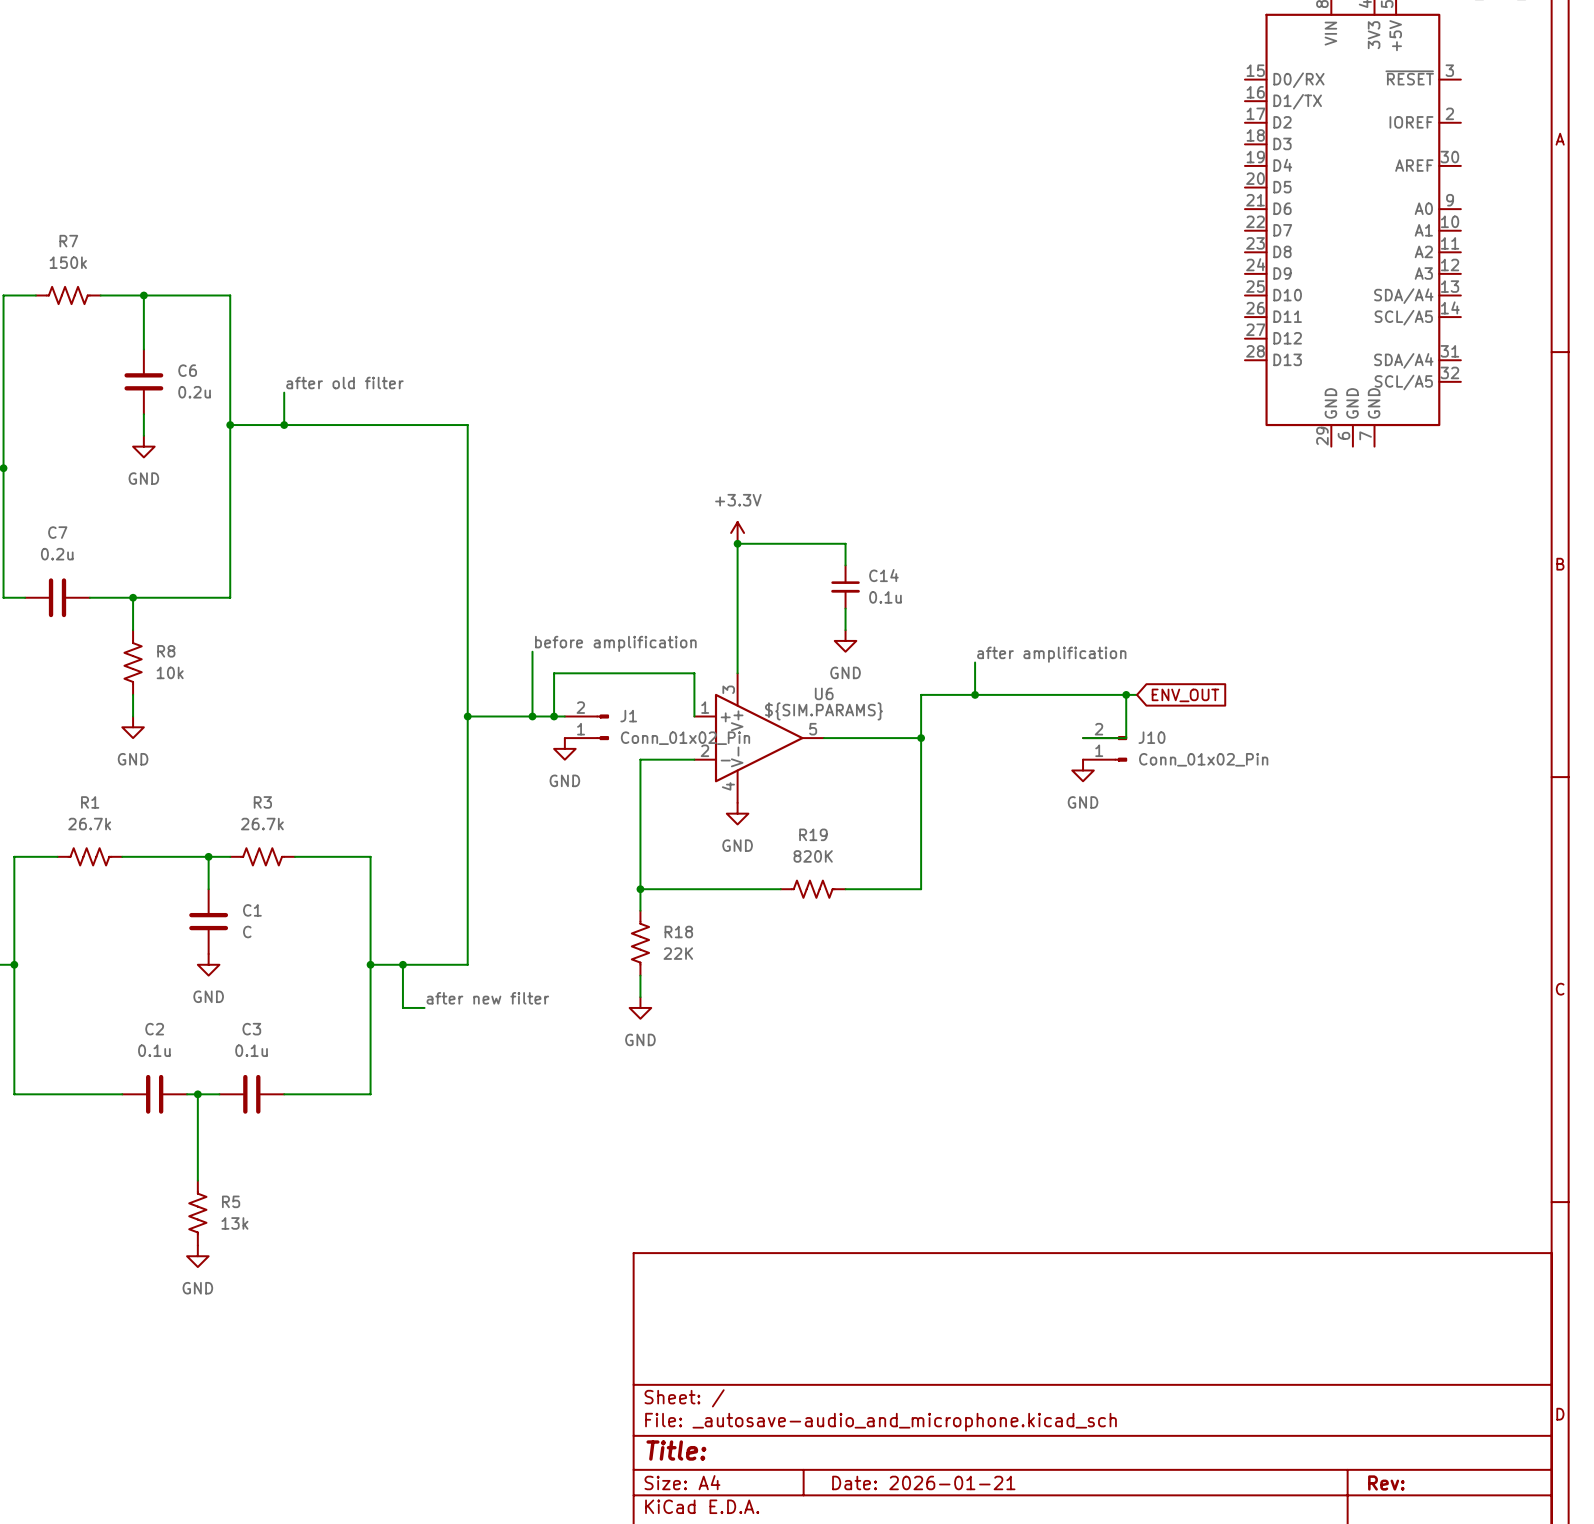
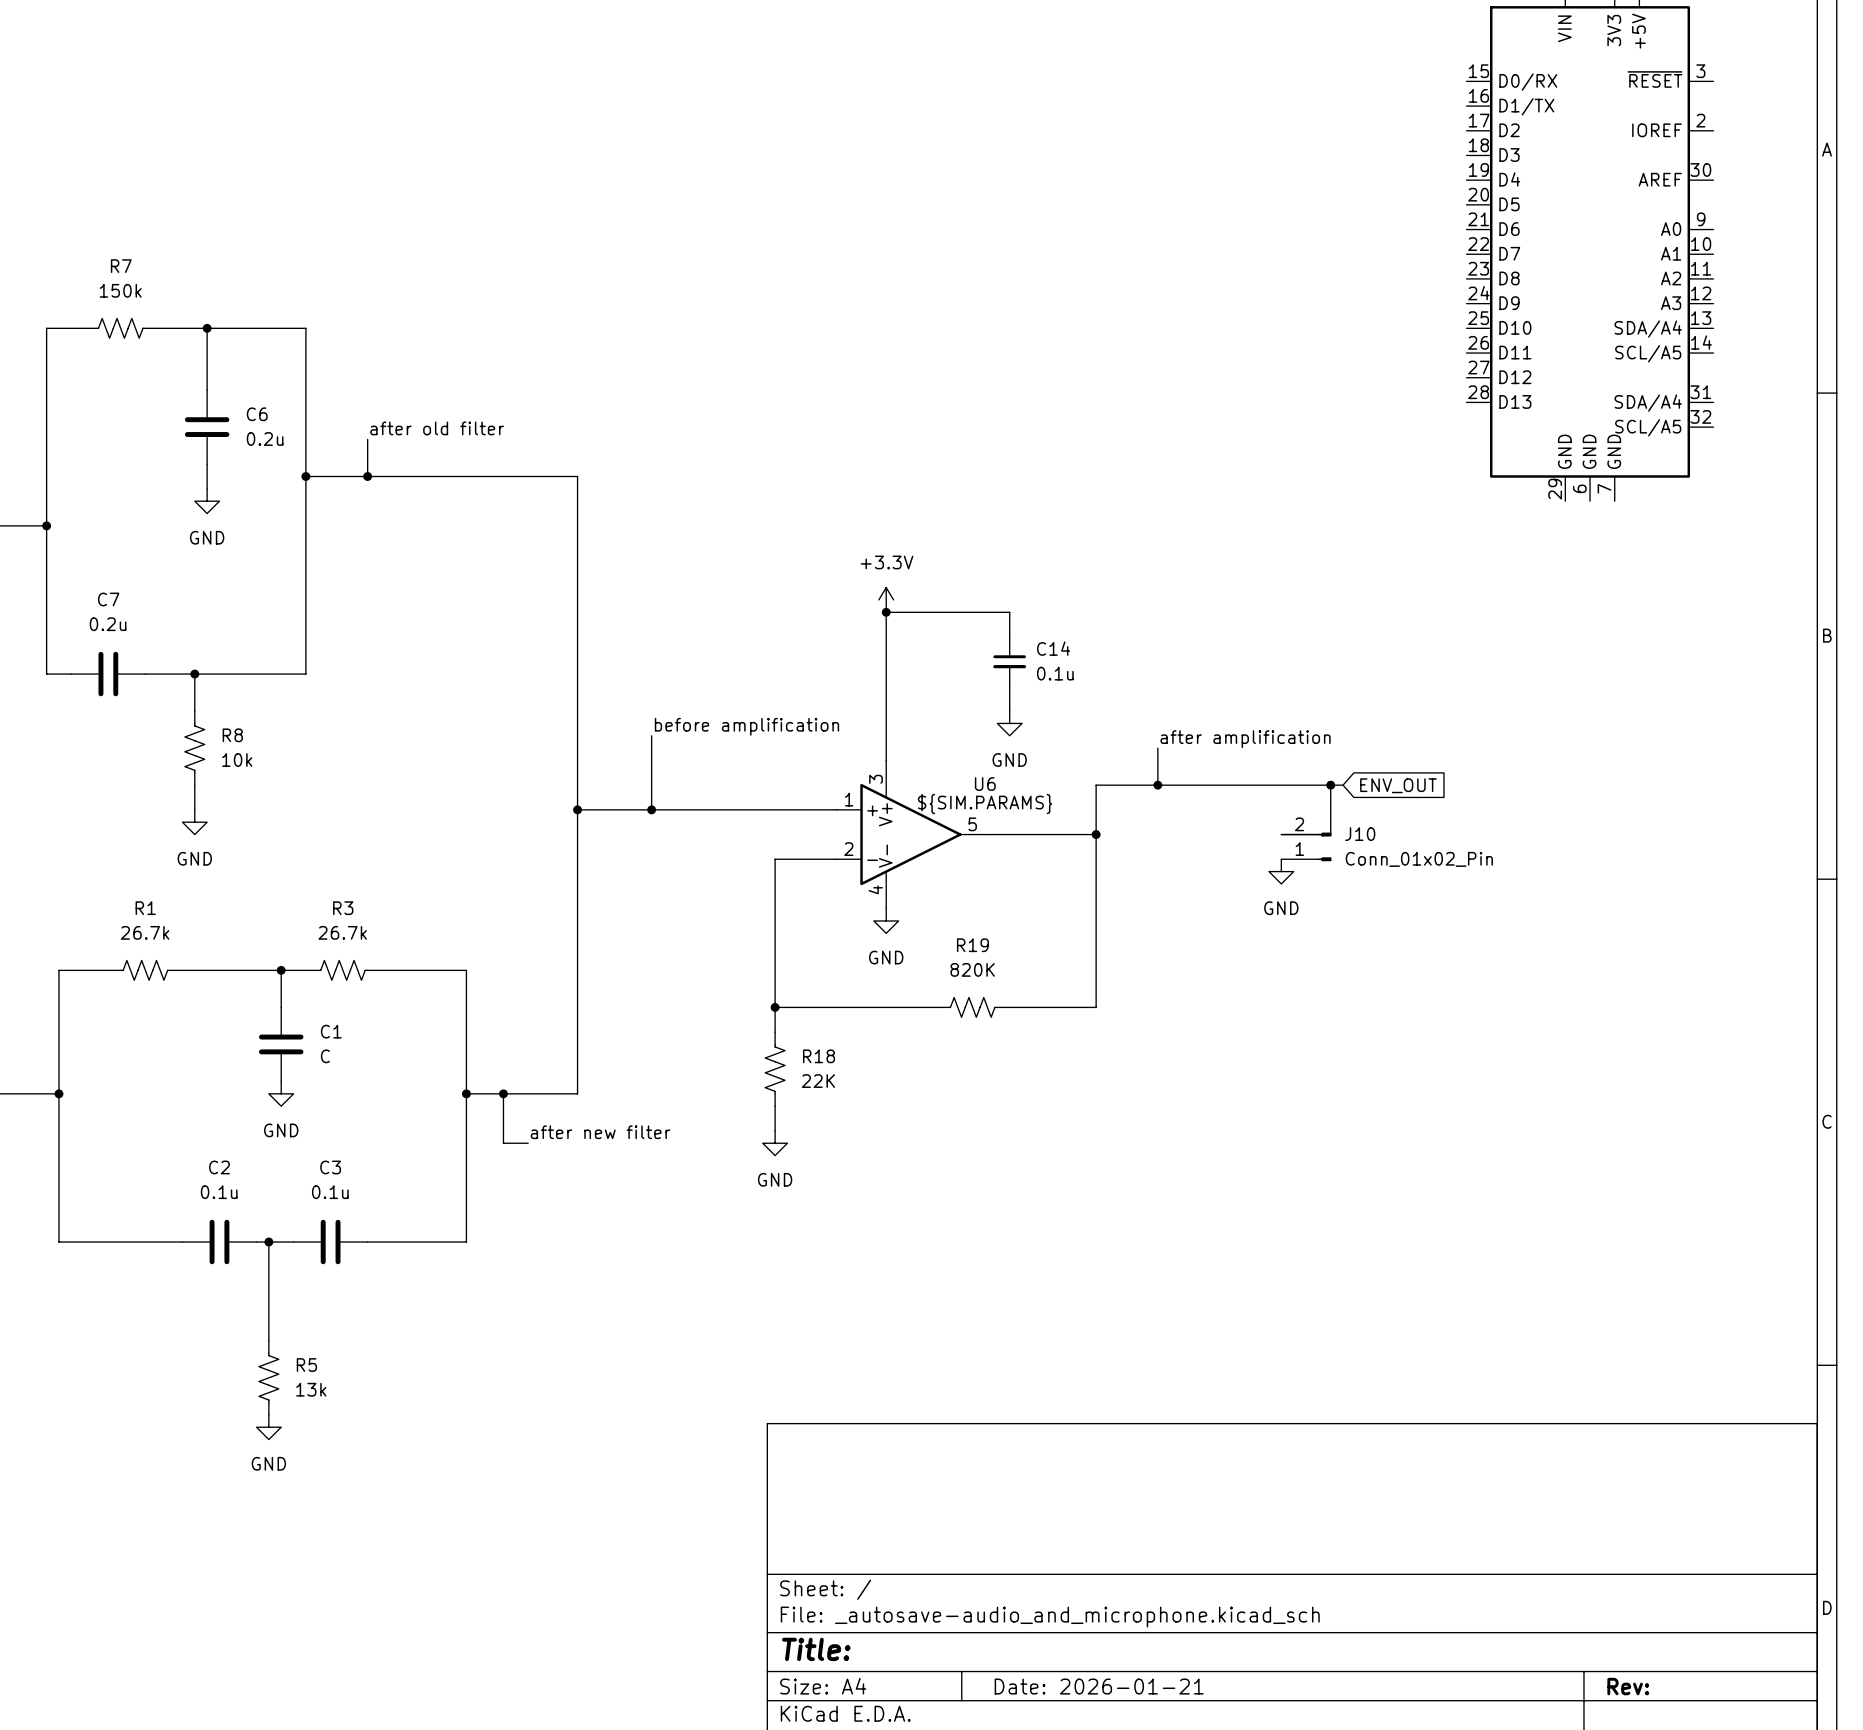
wire: (554, 716) (554, 673) (694, 673) (694, 716) -> (688, 809) (836, 809)
junction: (554, 716) -> none
J1: Conn_01x02_Pin (586, 727) -> none
power symbol: GND (564, 748) -> none

